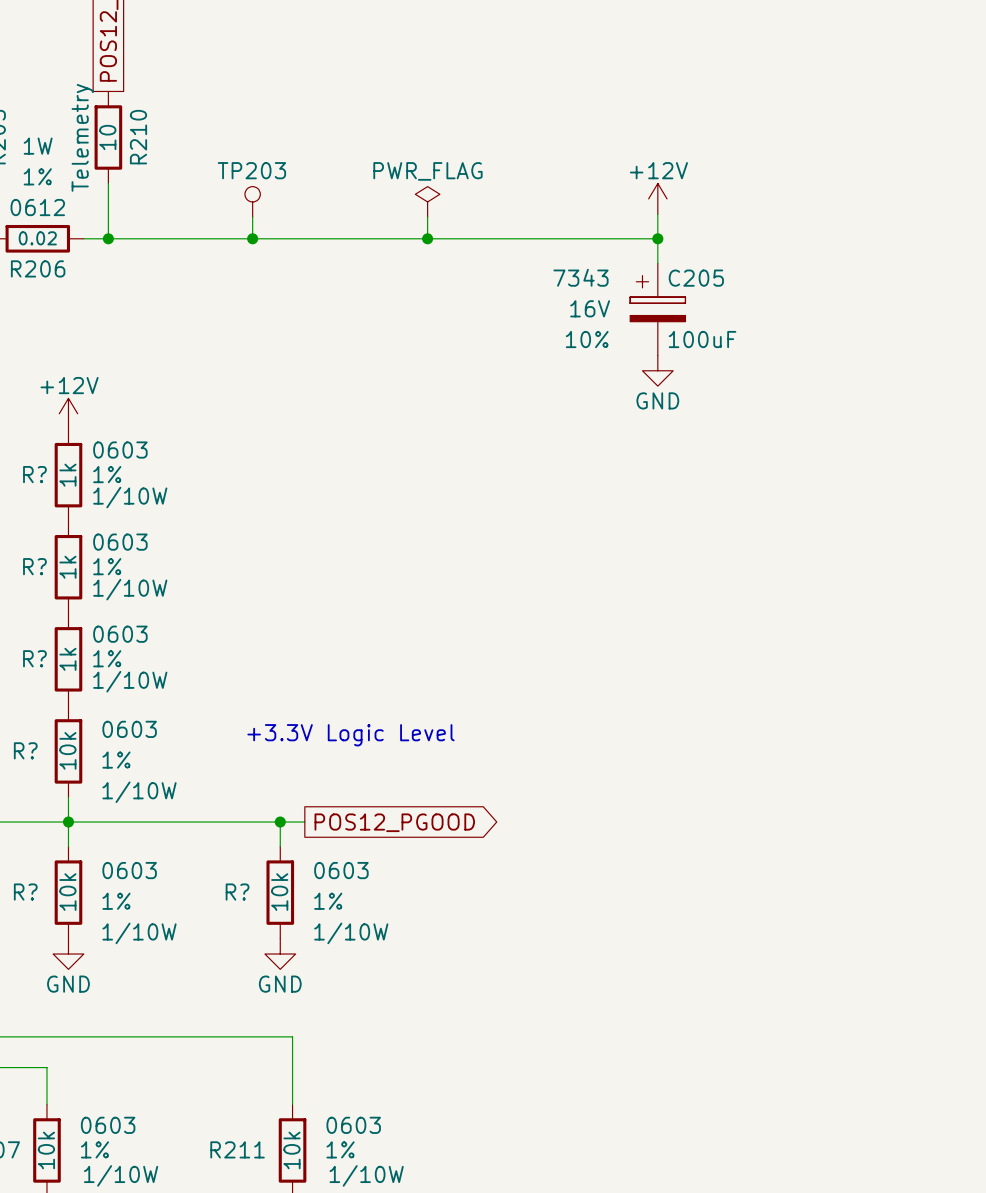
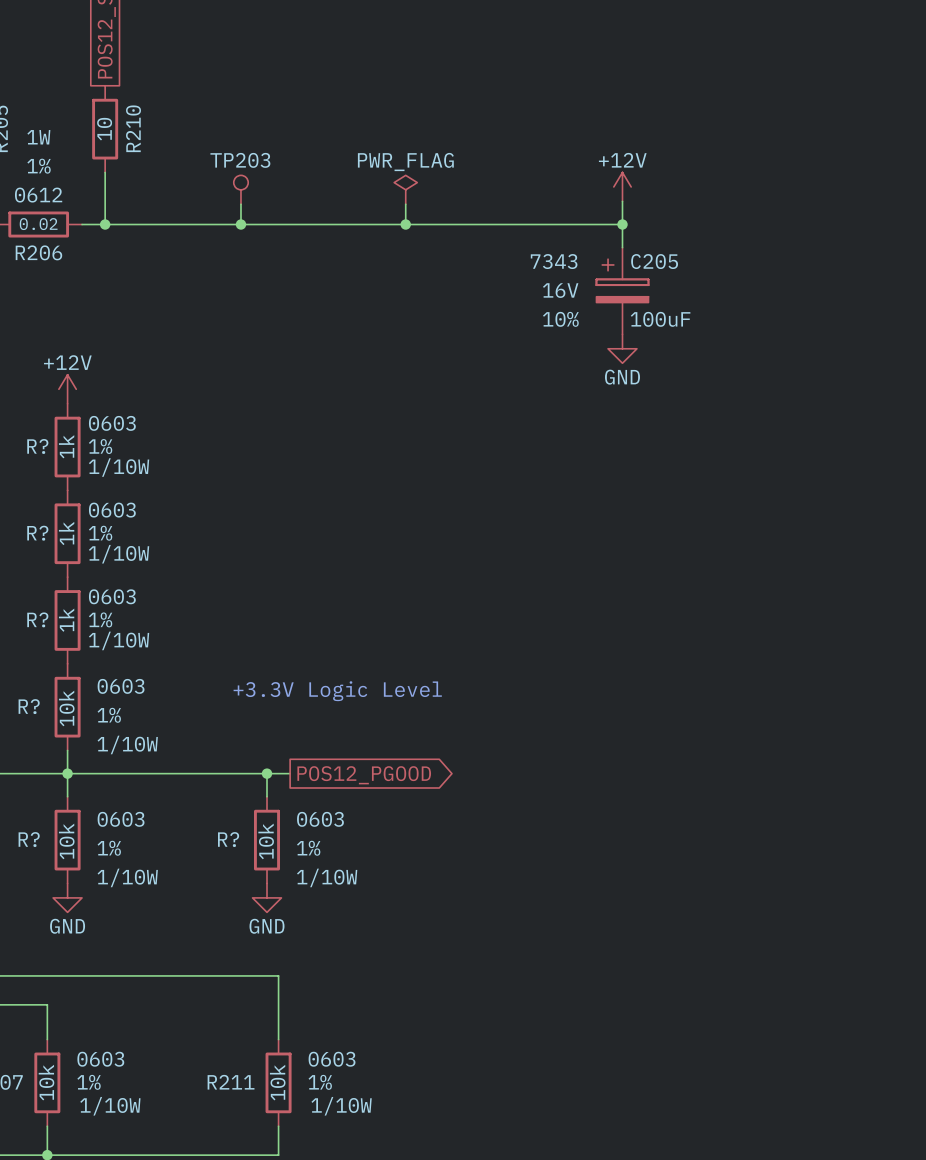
R210 text: Telemetry (82, 137) -> none

